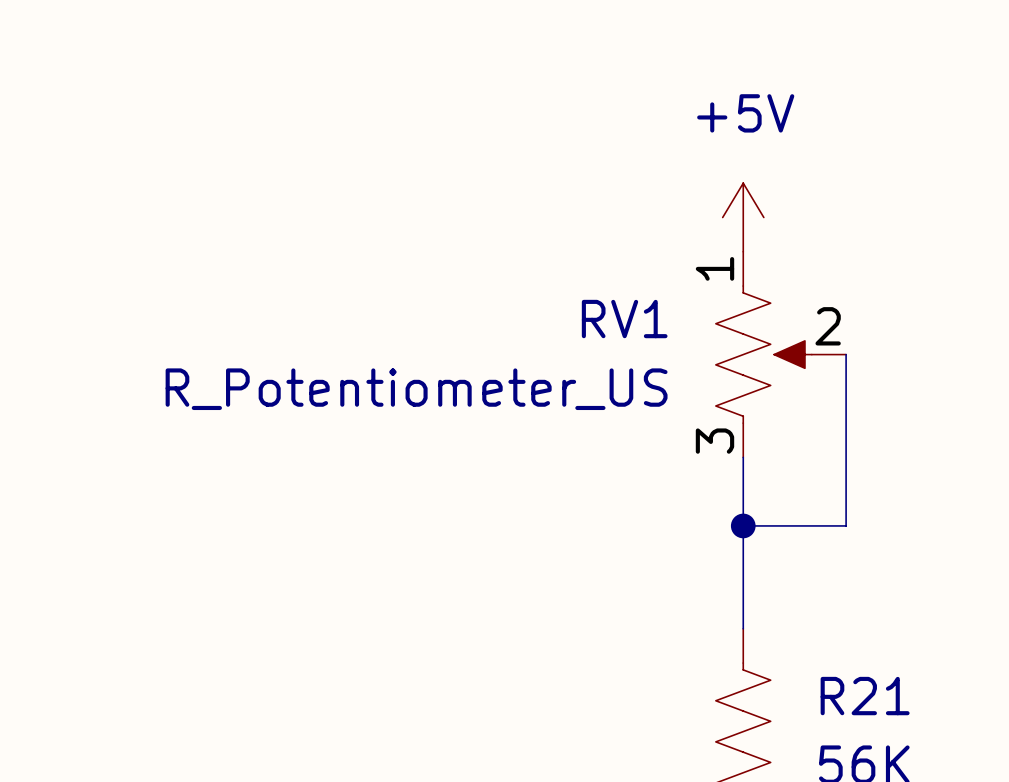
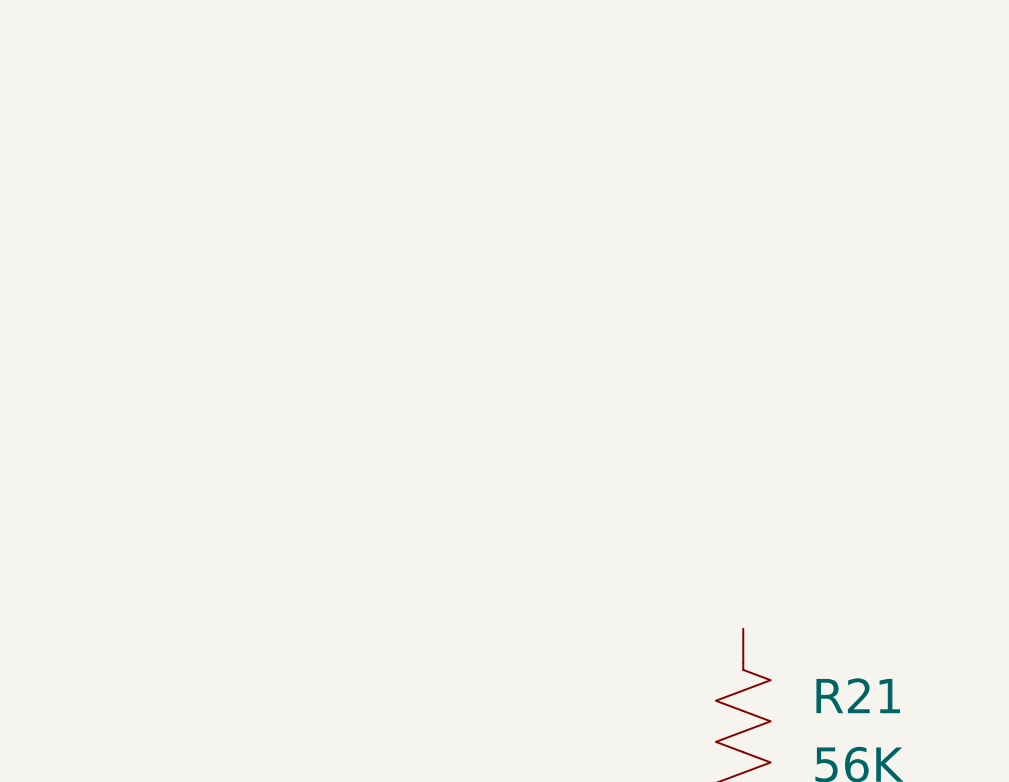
power symbol: +5V (743, 217) -> none
RV1: R_Potentiometer_US (780, 354) -> none
wire: (846, 354) (846, 525) (743, 525) -> none
wire: (743, 457) (743, 628) -> none
junction: (743, 525) -> none

